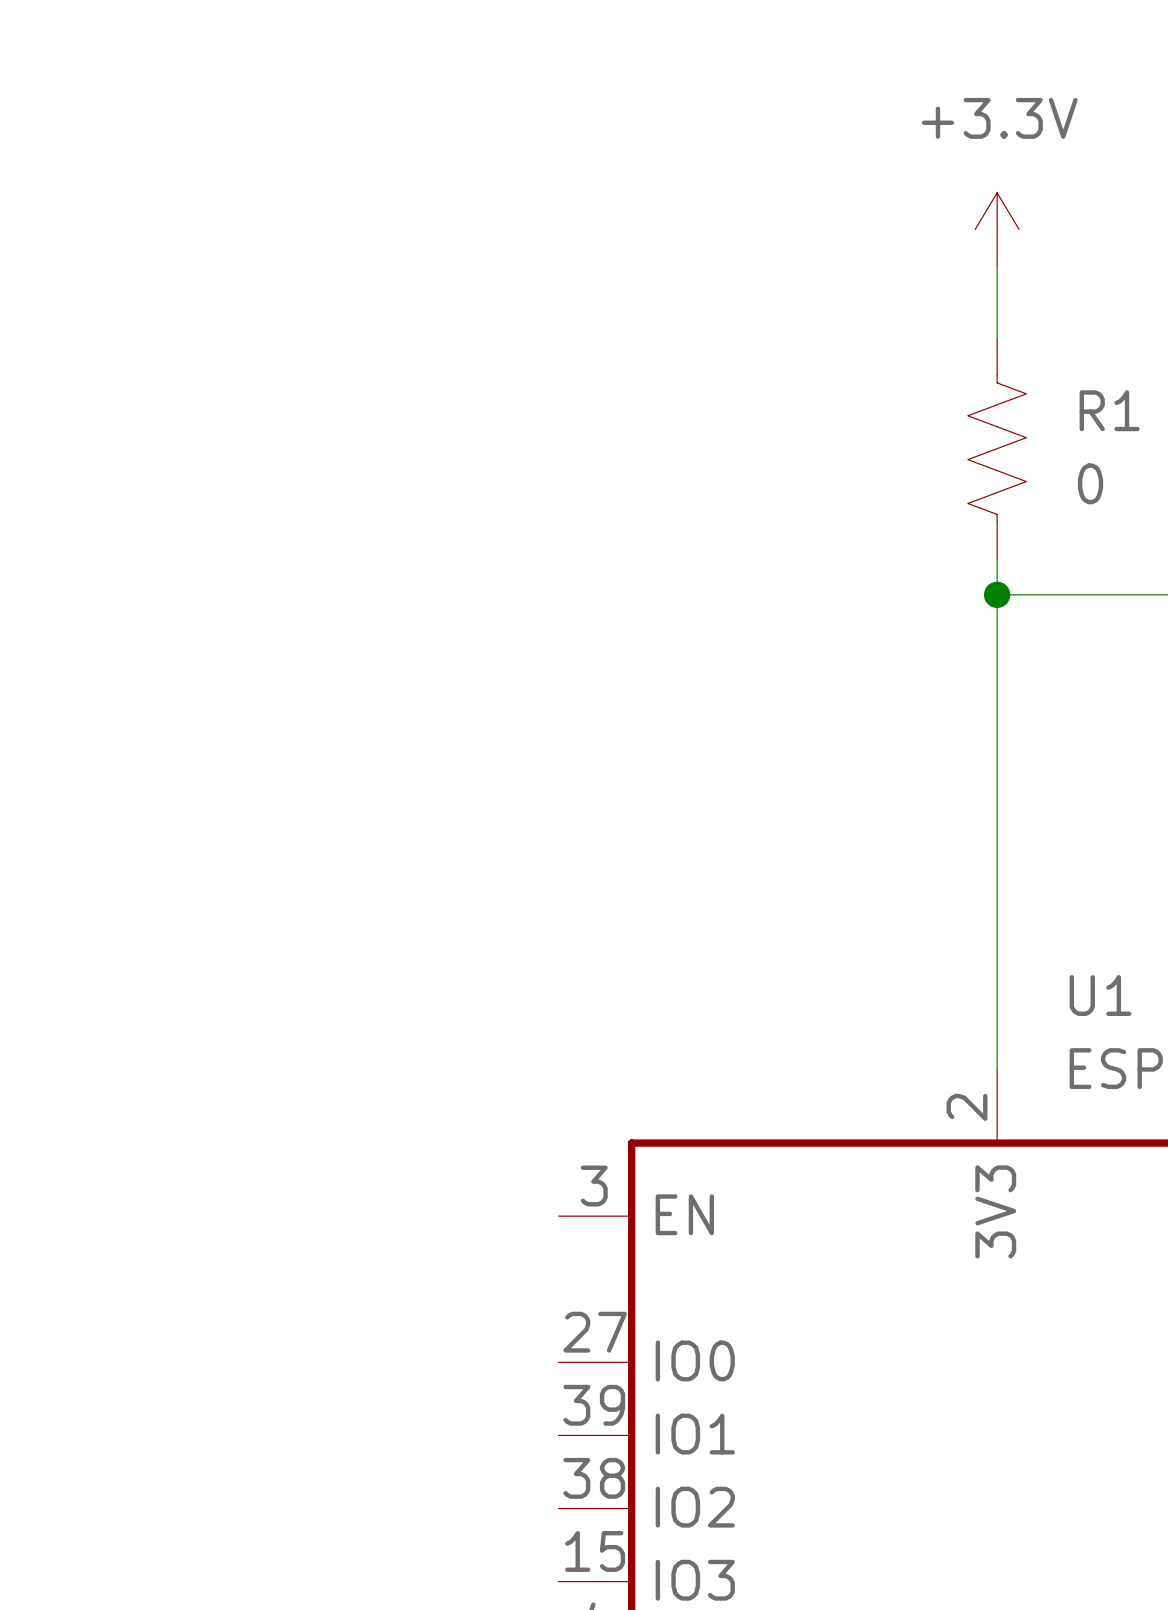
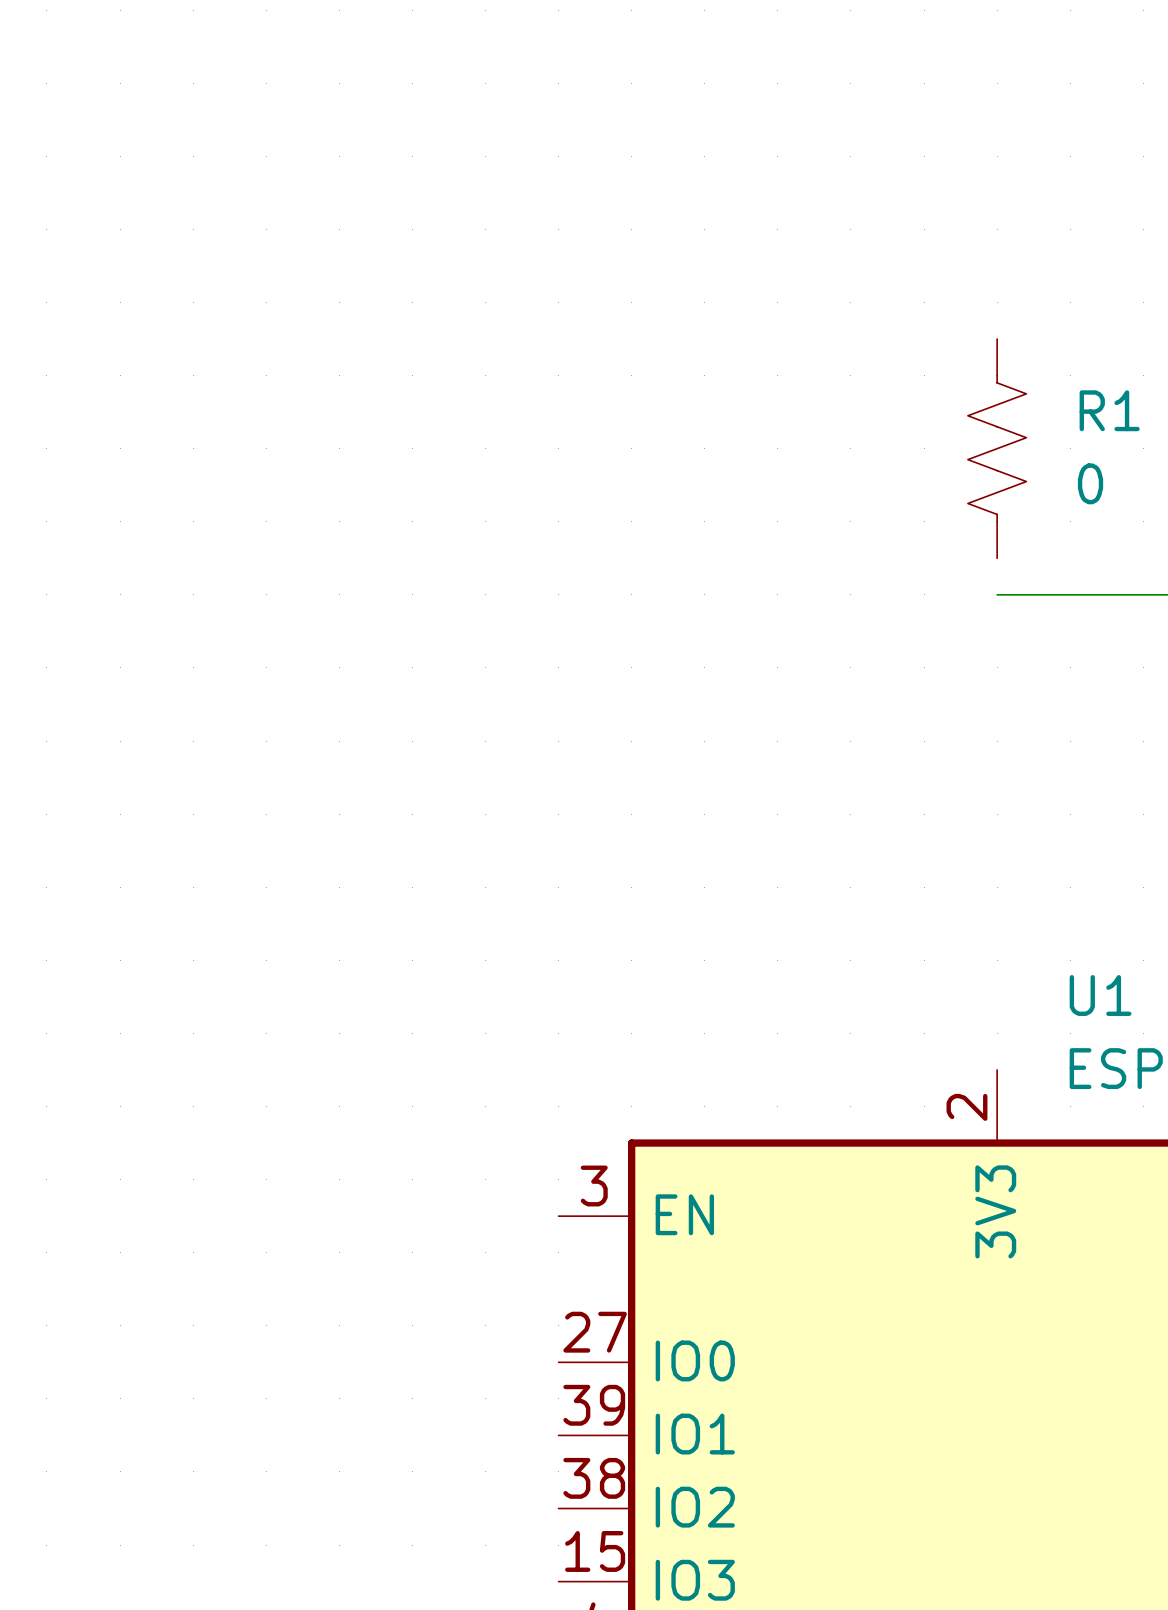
power symbol: +3.3V (997, 229) -> none
wire: (997, 265) (997, 339) -> none
wire: (997, 558) (997, 1069) -> none
junction: (997, 594) -> none

